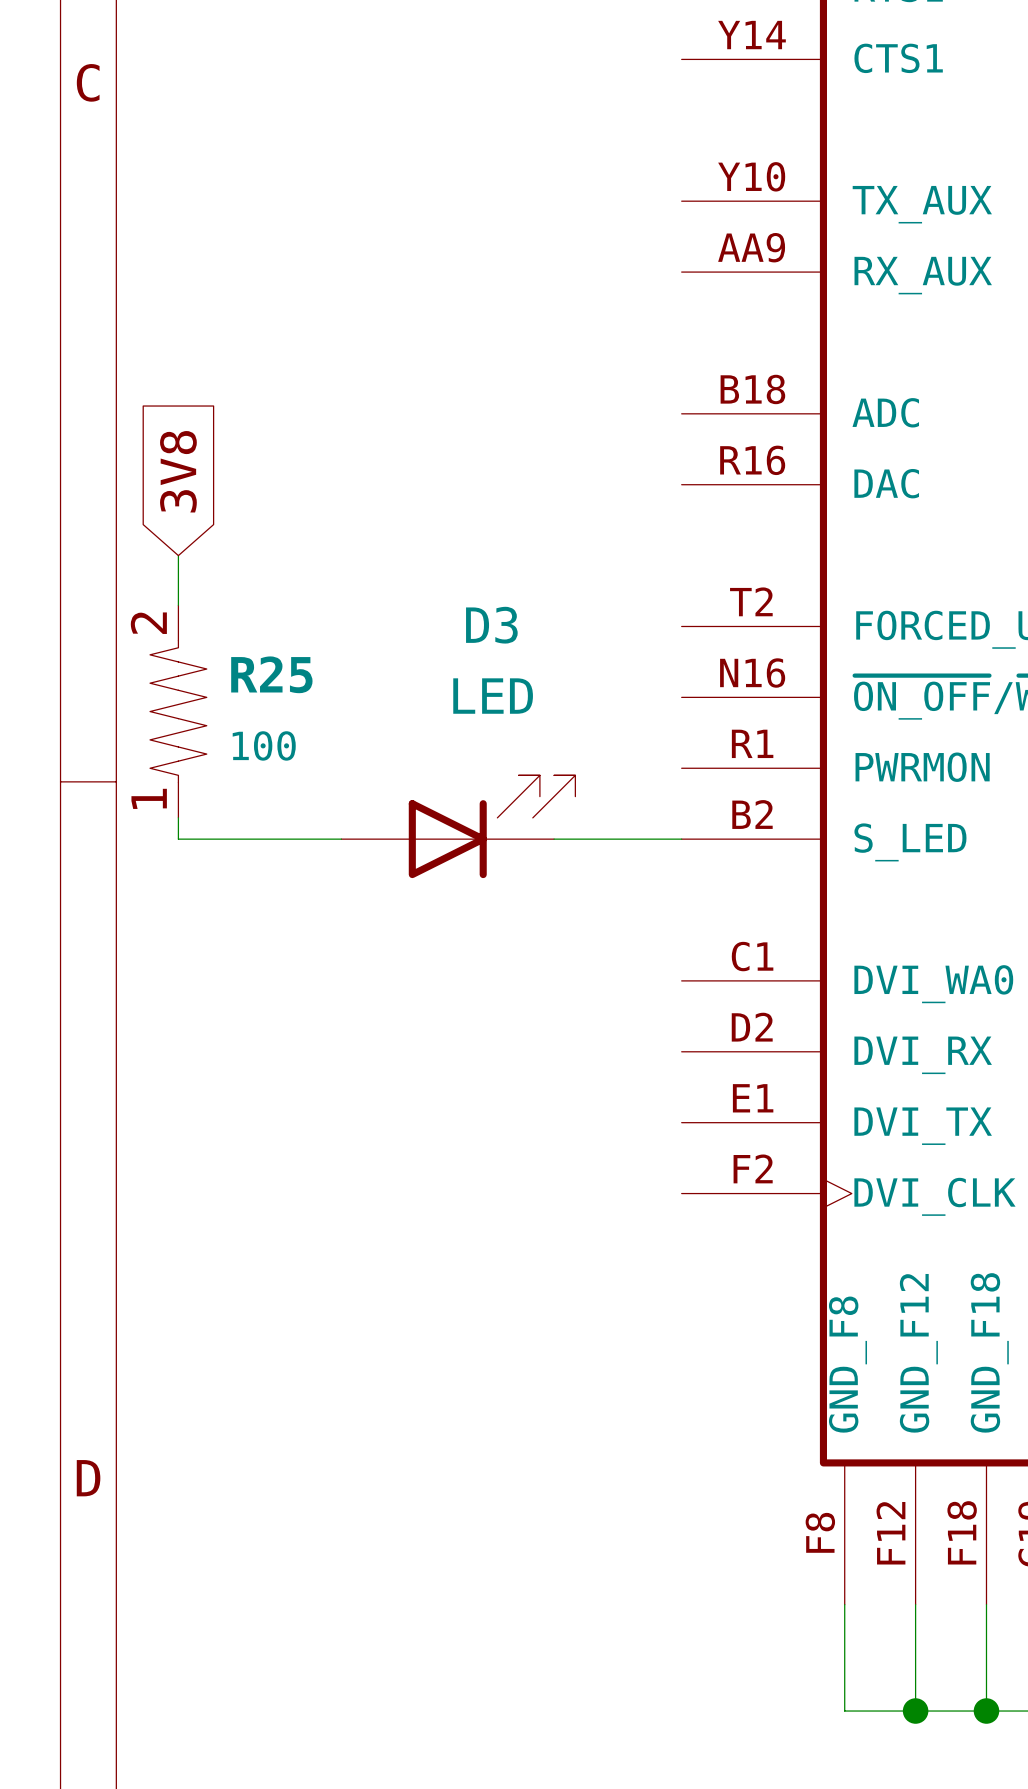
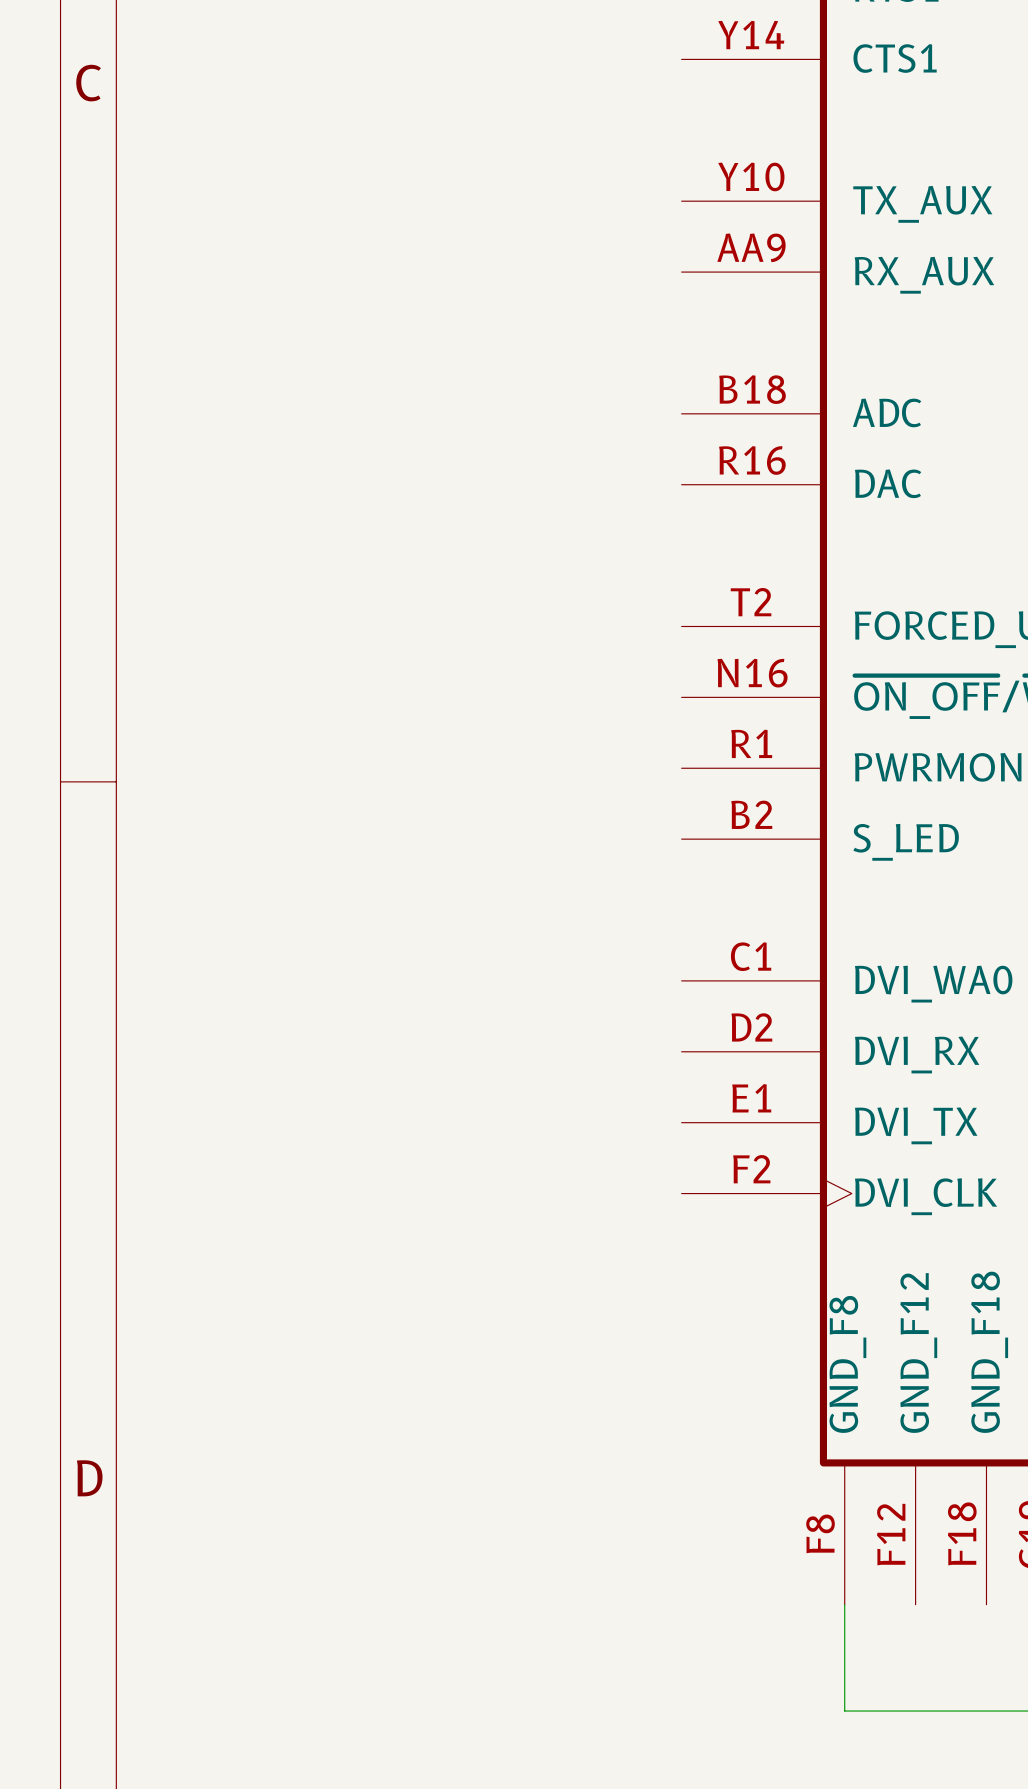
global label: 3V8 (178, 471) -> none
wire: (178, 555) (178, 605) -> none
R25: 100 (178, 711) -> none
wire: (178, 817) (178, 839) (341, 839) -> none
D3: LED (458, 826) -> none
wire: (554, 839) (681, 839) -> none
wire: (915, 1604) (915, 1711) -> none
wire: (986, 1604) (986, 1711) -> none
junction: (915, 1711) -> none
junction: (986, 1711) -> none

